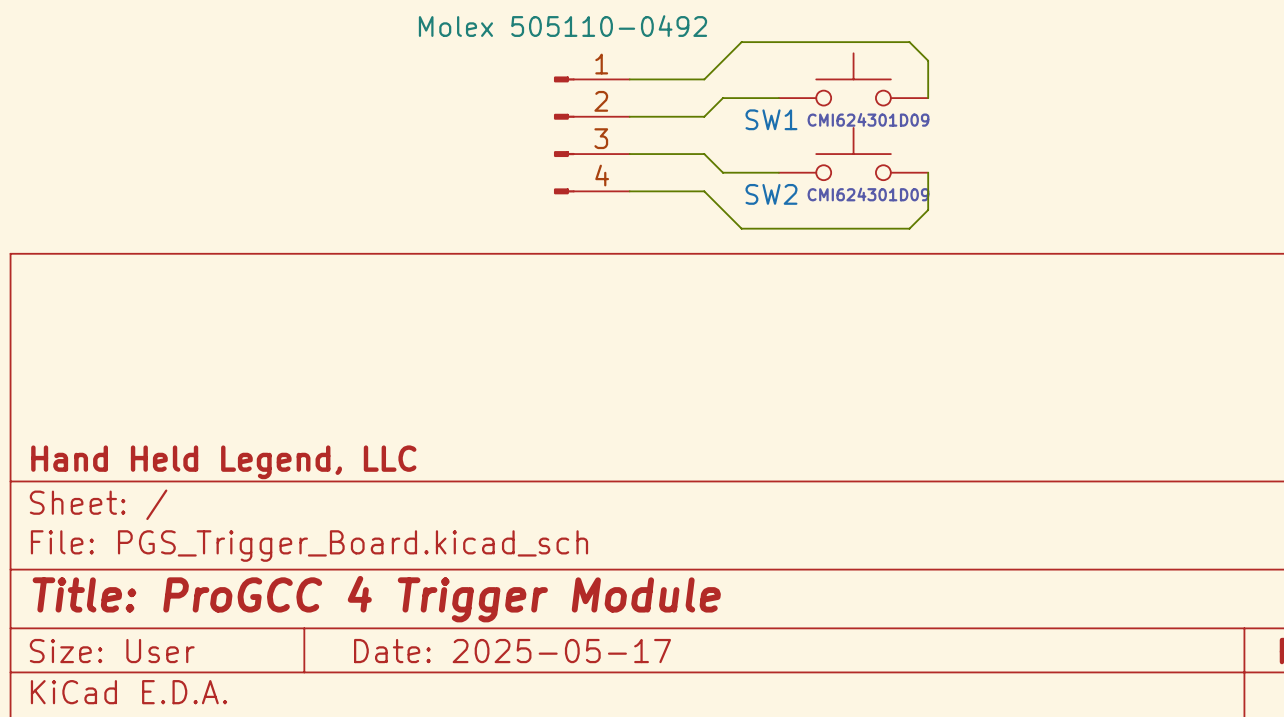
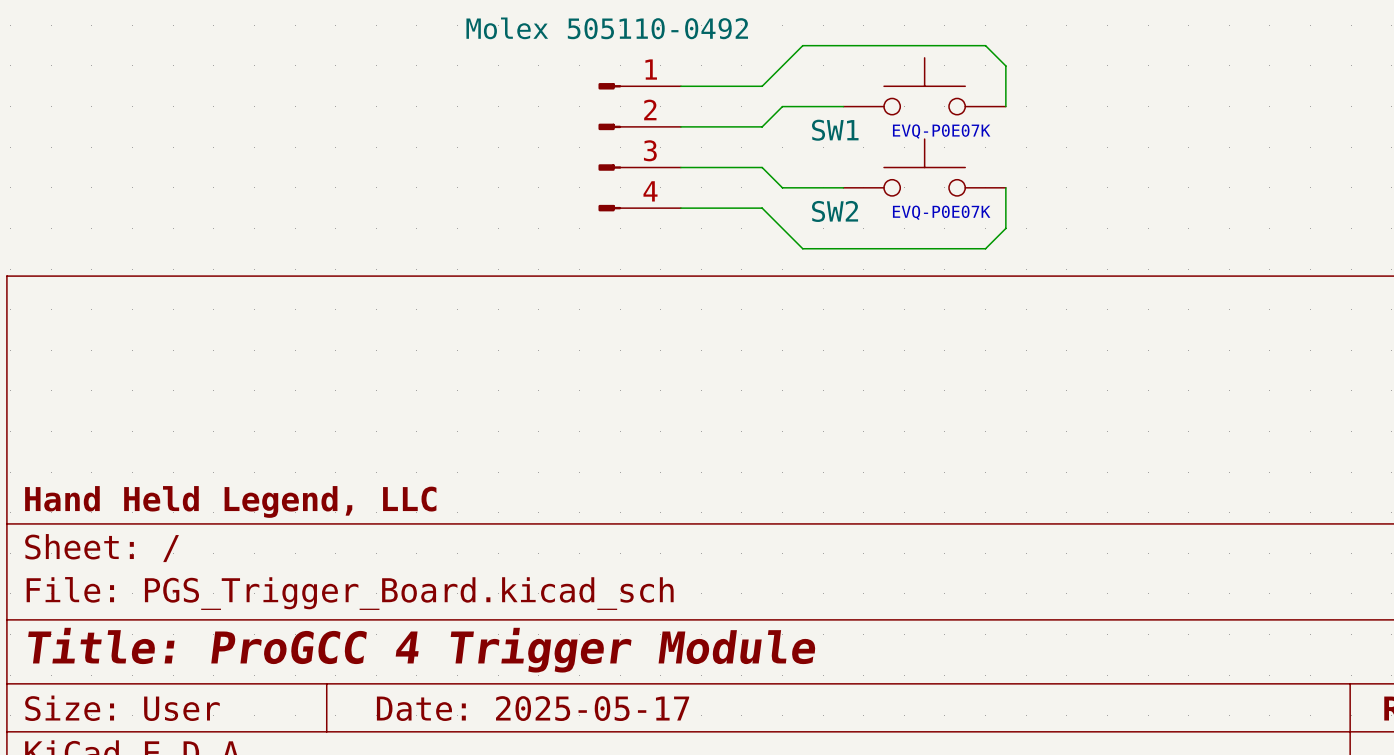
text: CMI624301D09 (868, 119) -> EVQ-P0E07K (941, 131)
text: CMI624301D09 (868, 194) -> EVQ-P0E07K (941, 212)

